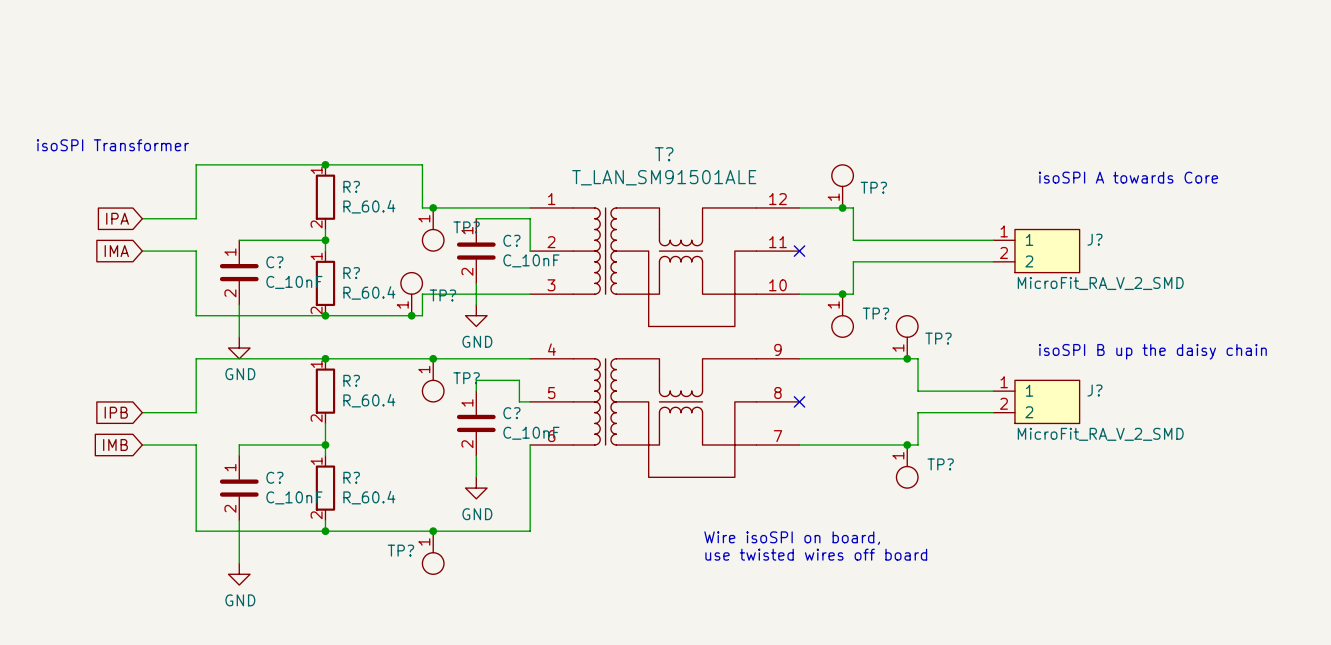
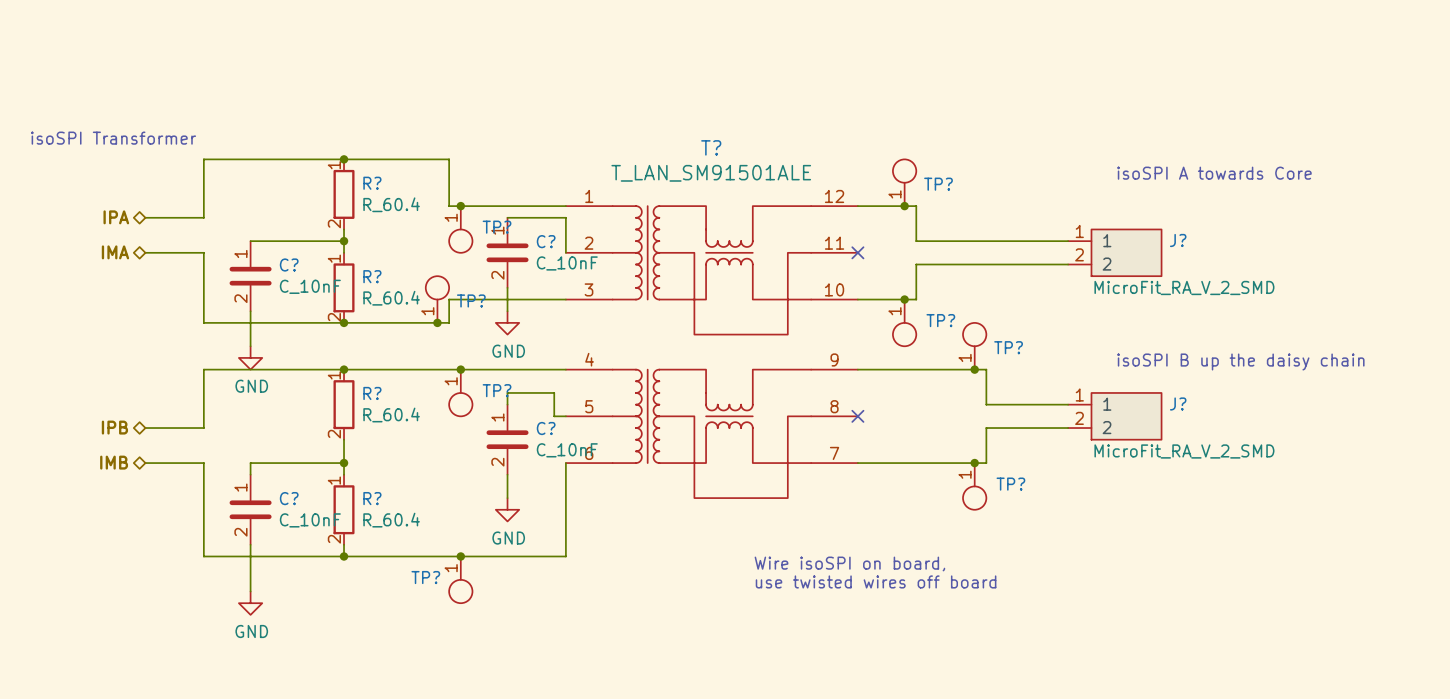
hierarchical label: none -> IPA (116, 217)
global label: IPA (117, 218) -> none
hierarchical label: none -> IMA (115, 252)
global label: IMA (116, 251) -> none
hierarchical label: none -> IPB (114, 427)
global label: IPB (116, 412) -> none
hierarchical label: none -> IMB (114, 462)
global label: IMB (115, 444) -> none

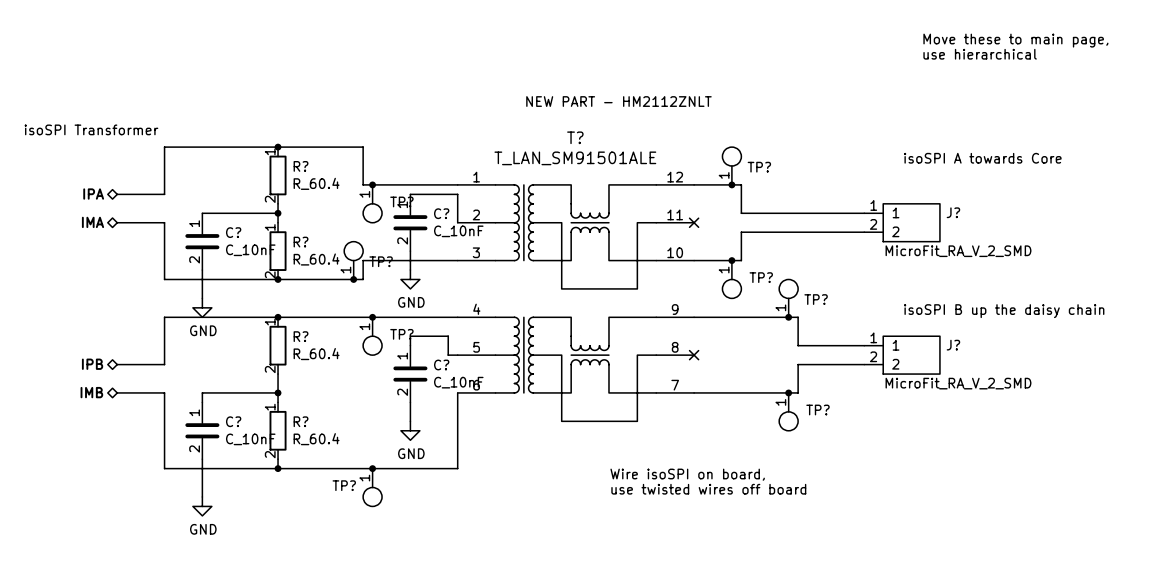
text: none -> Move these to main page, (1015, 40)
text: none -> use hierarchical (980, 54)
text: none -> NEW PART - HM2112ZNLT (618, 101)

